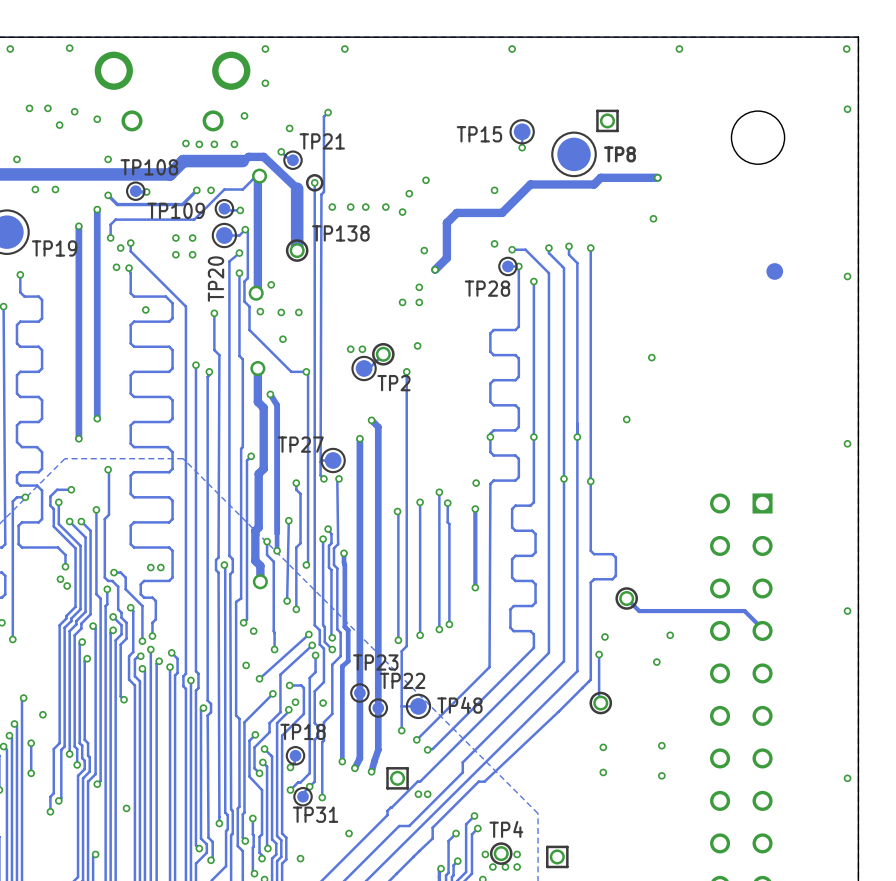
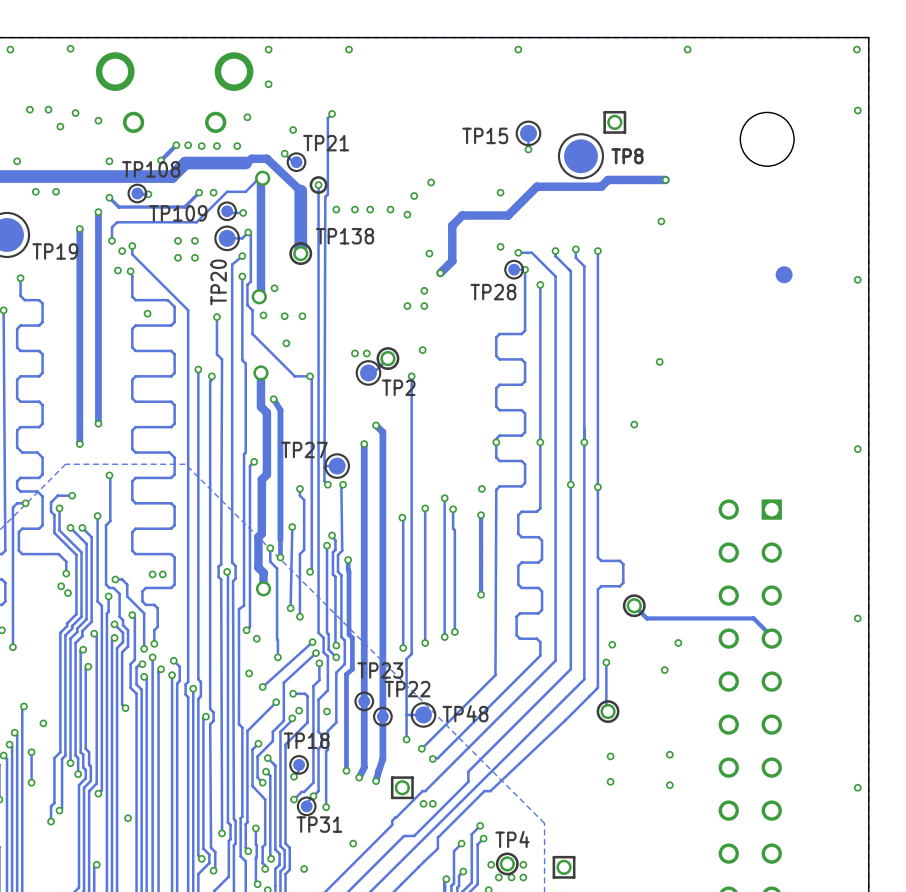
track: none -> (176, 145) (161, 160)
via: none -> (176, 145)
via: none -> (161, 160)

